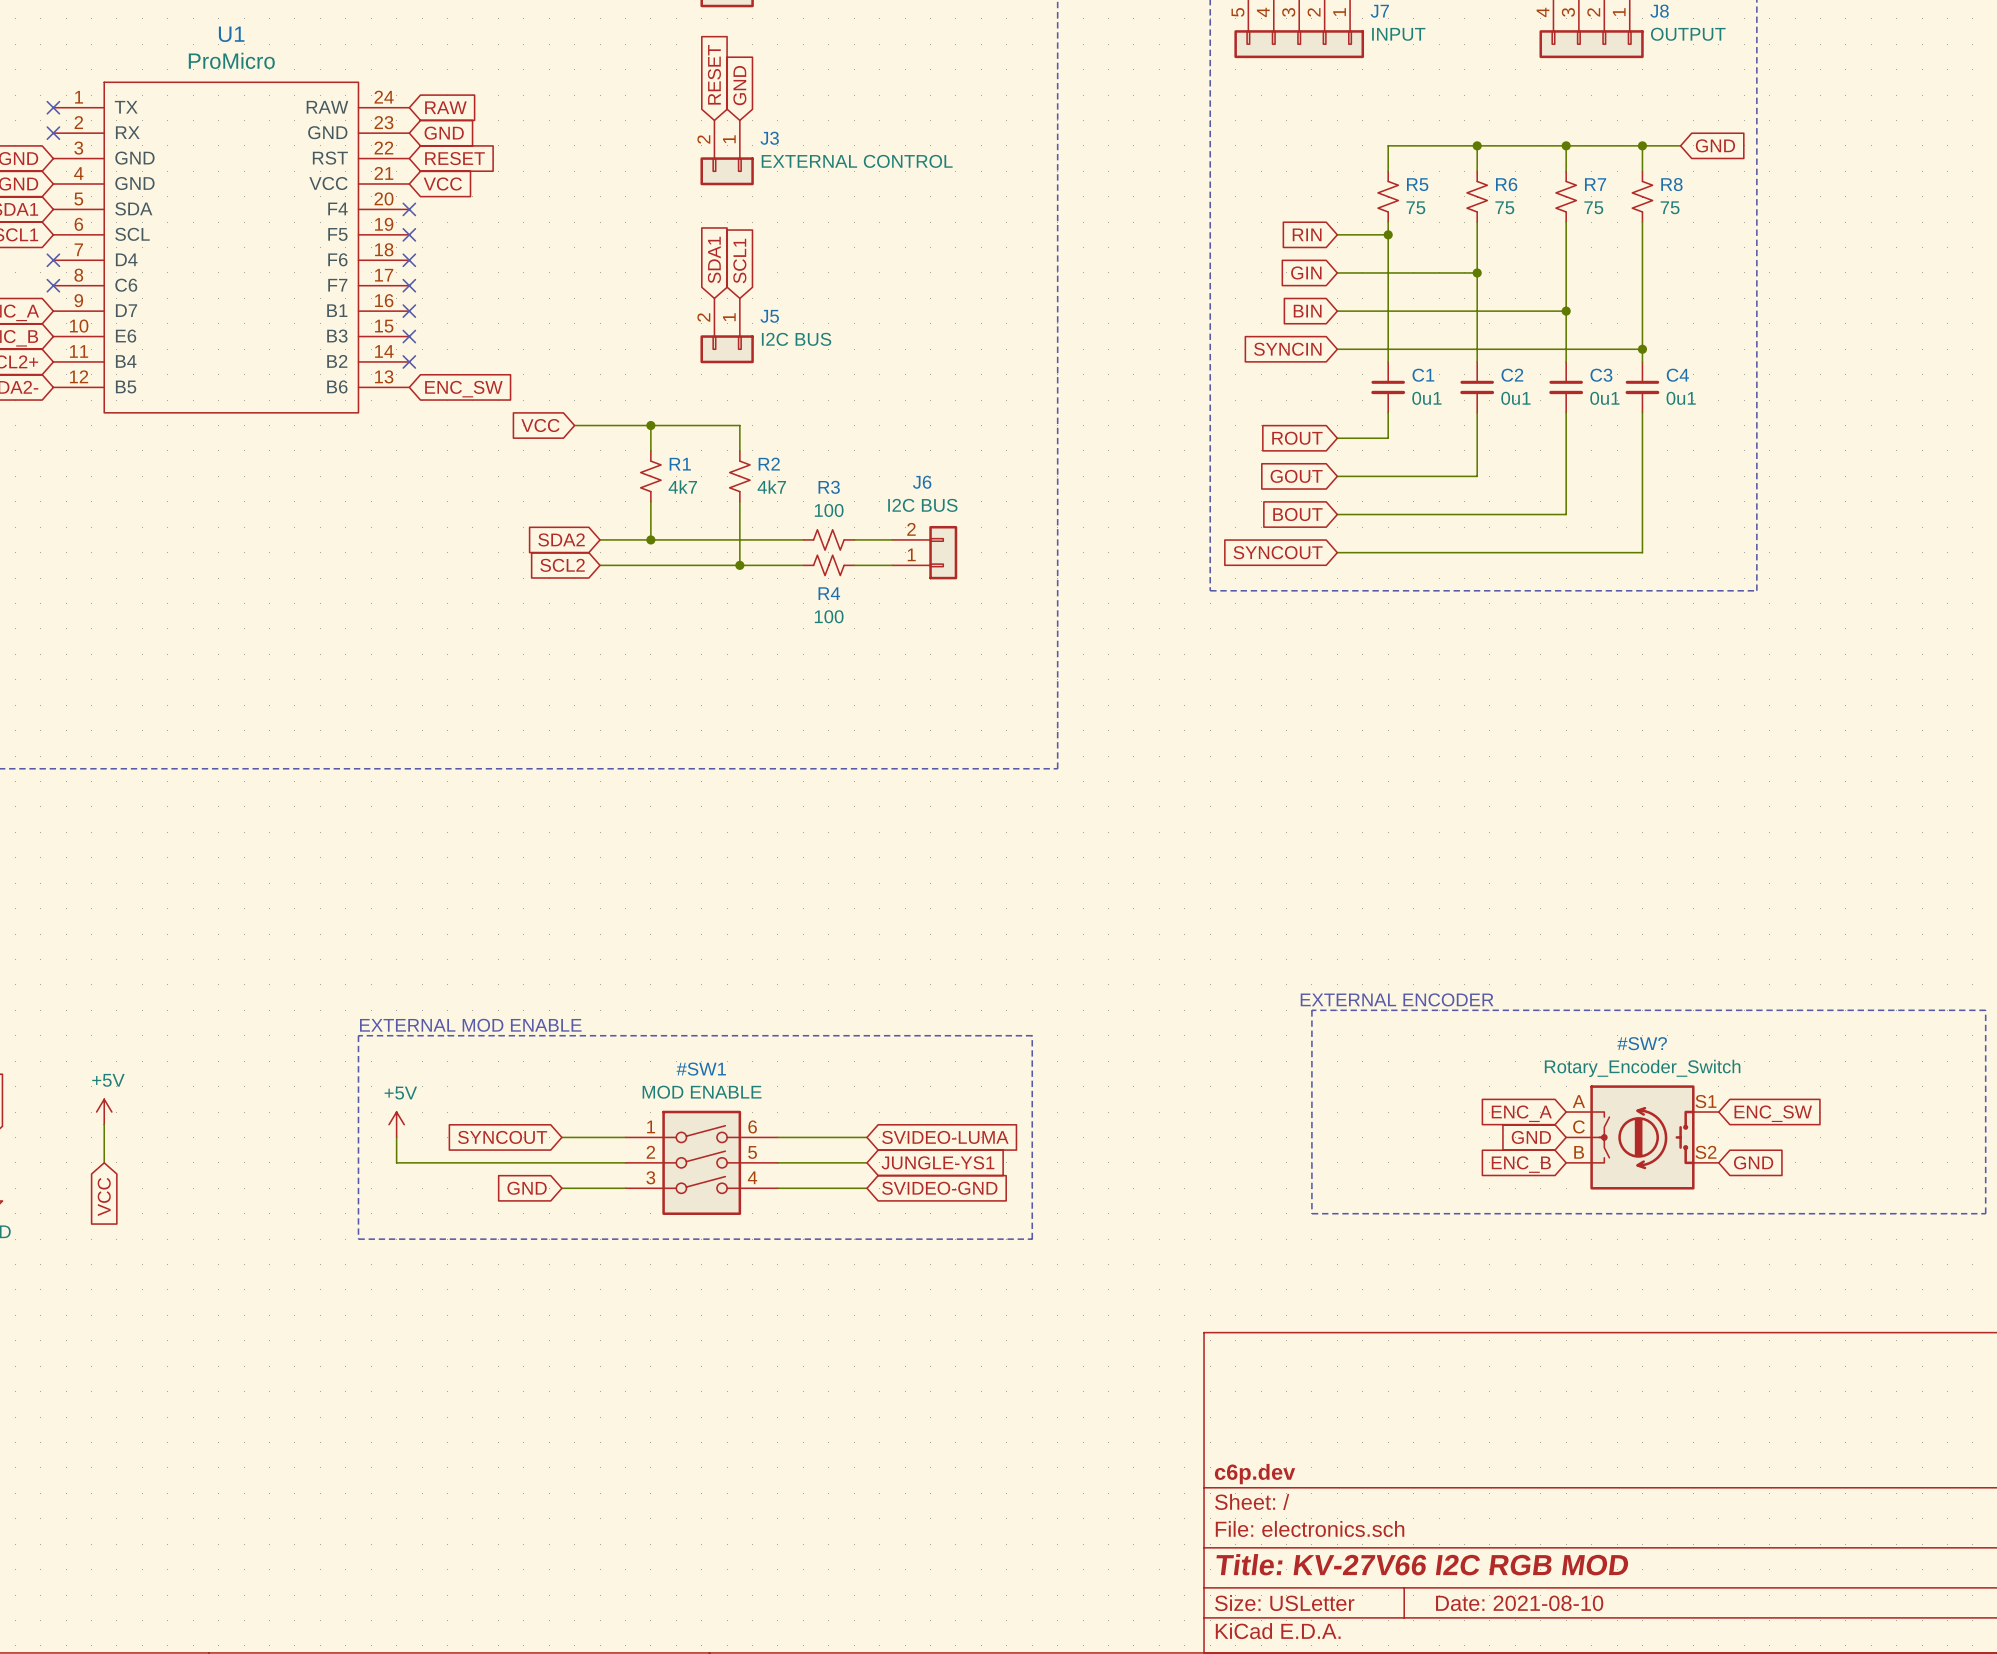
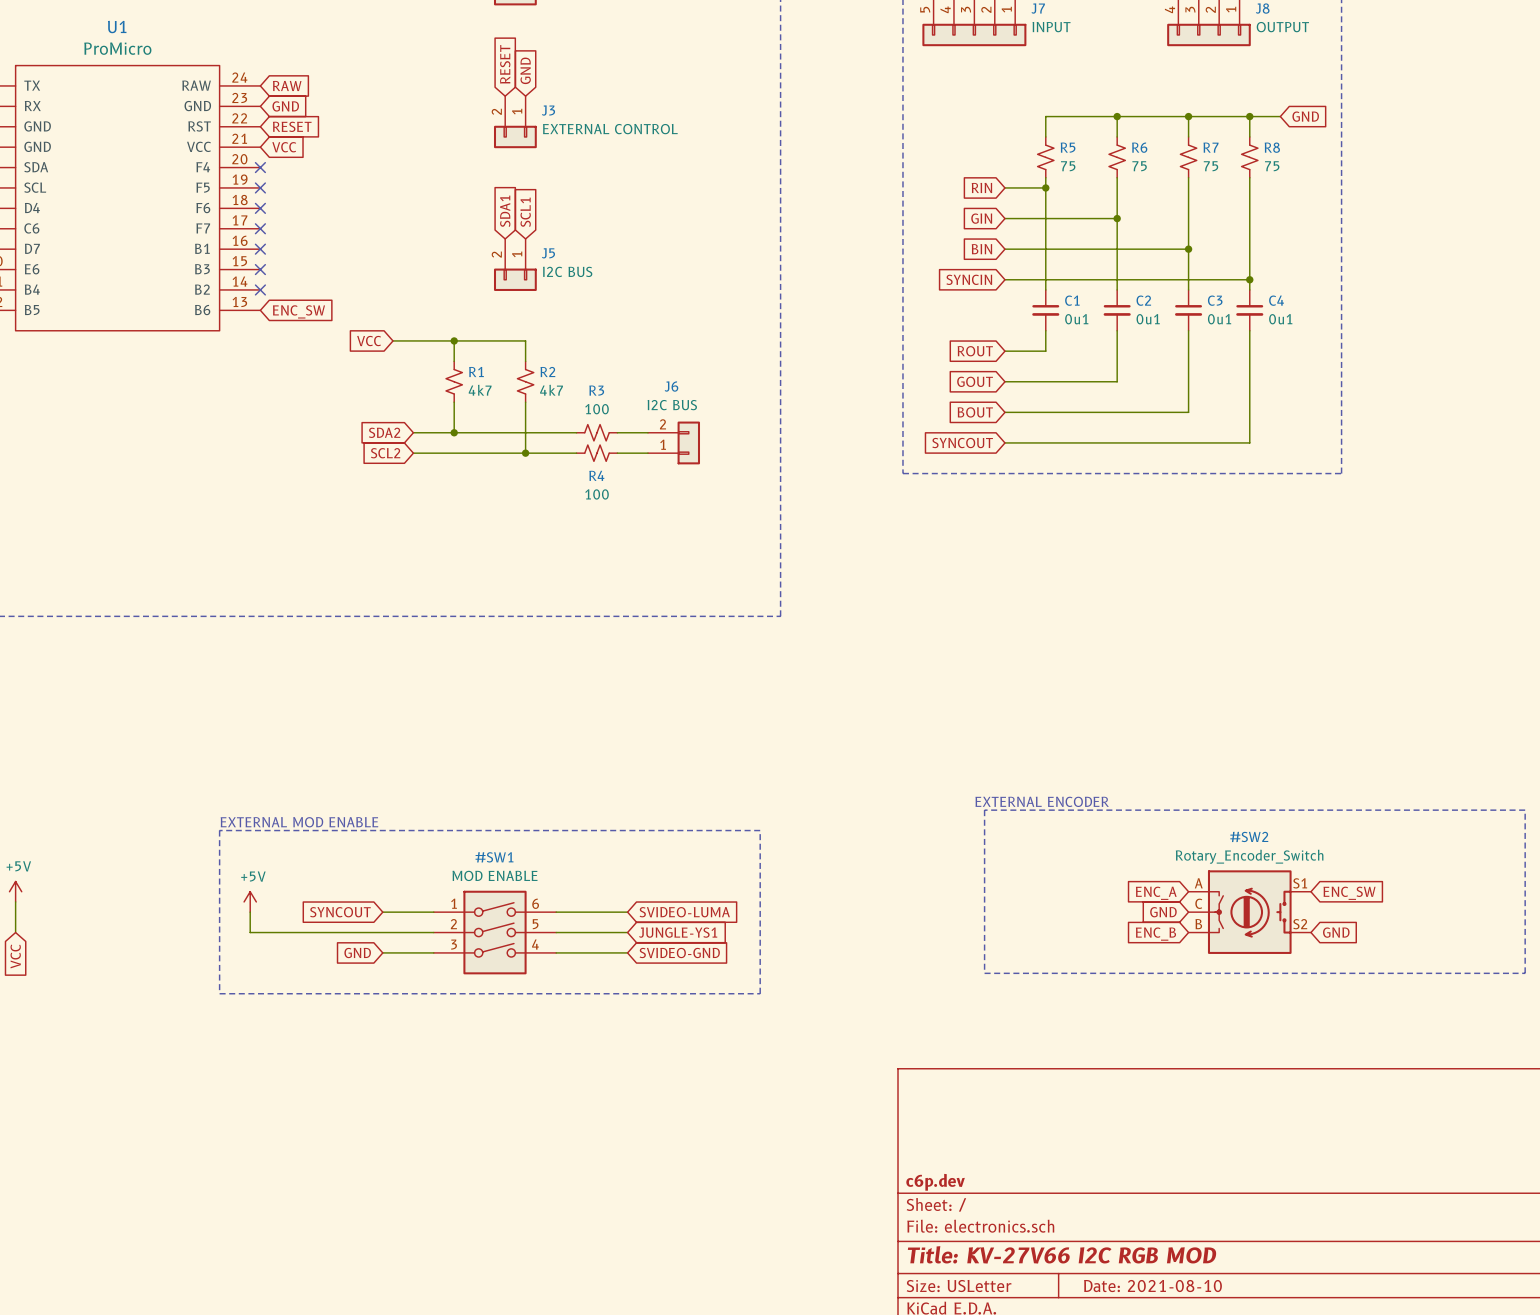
#SW? name: #SW? (1642, 1043) -> #SW2 (1249, 836)

